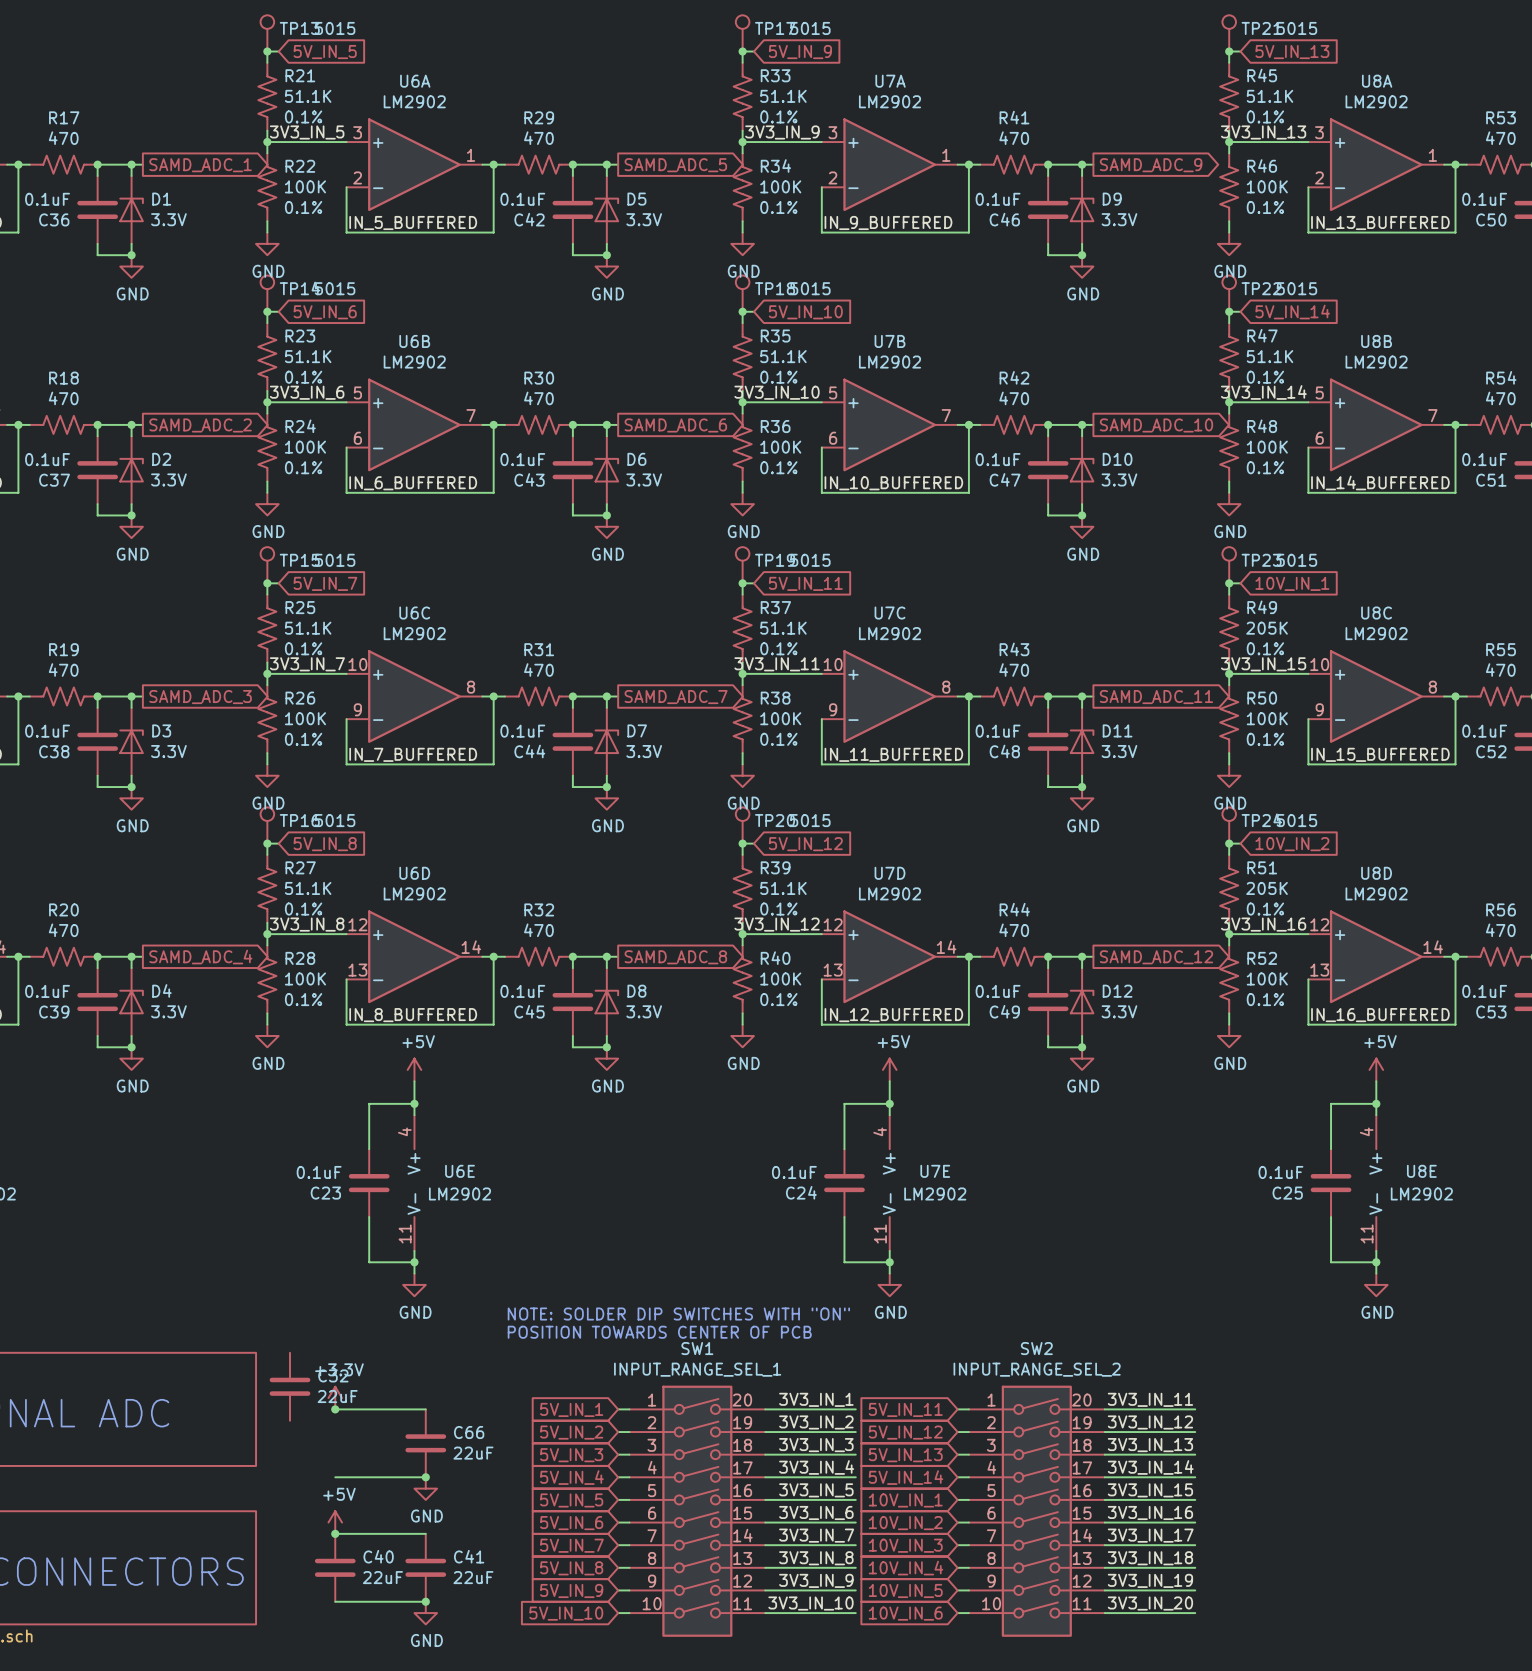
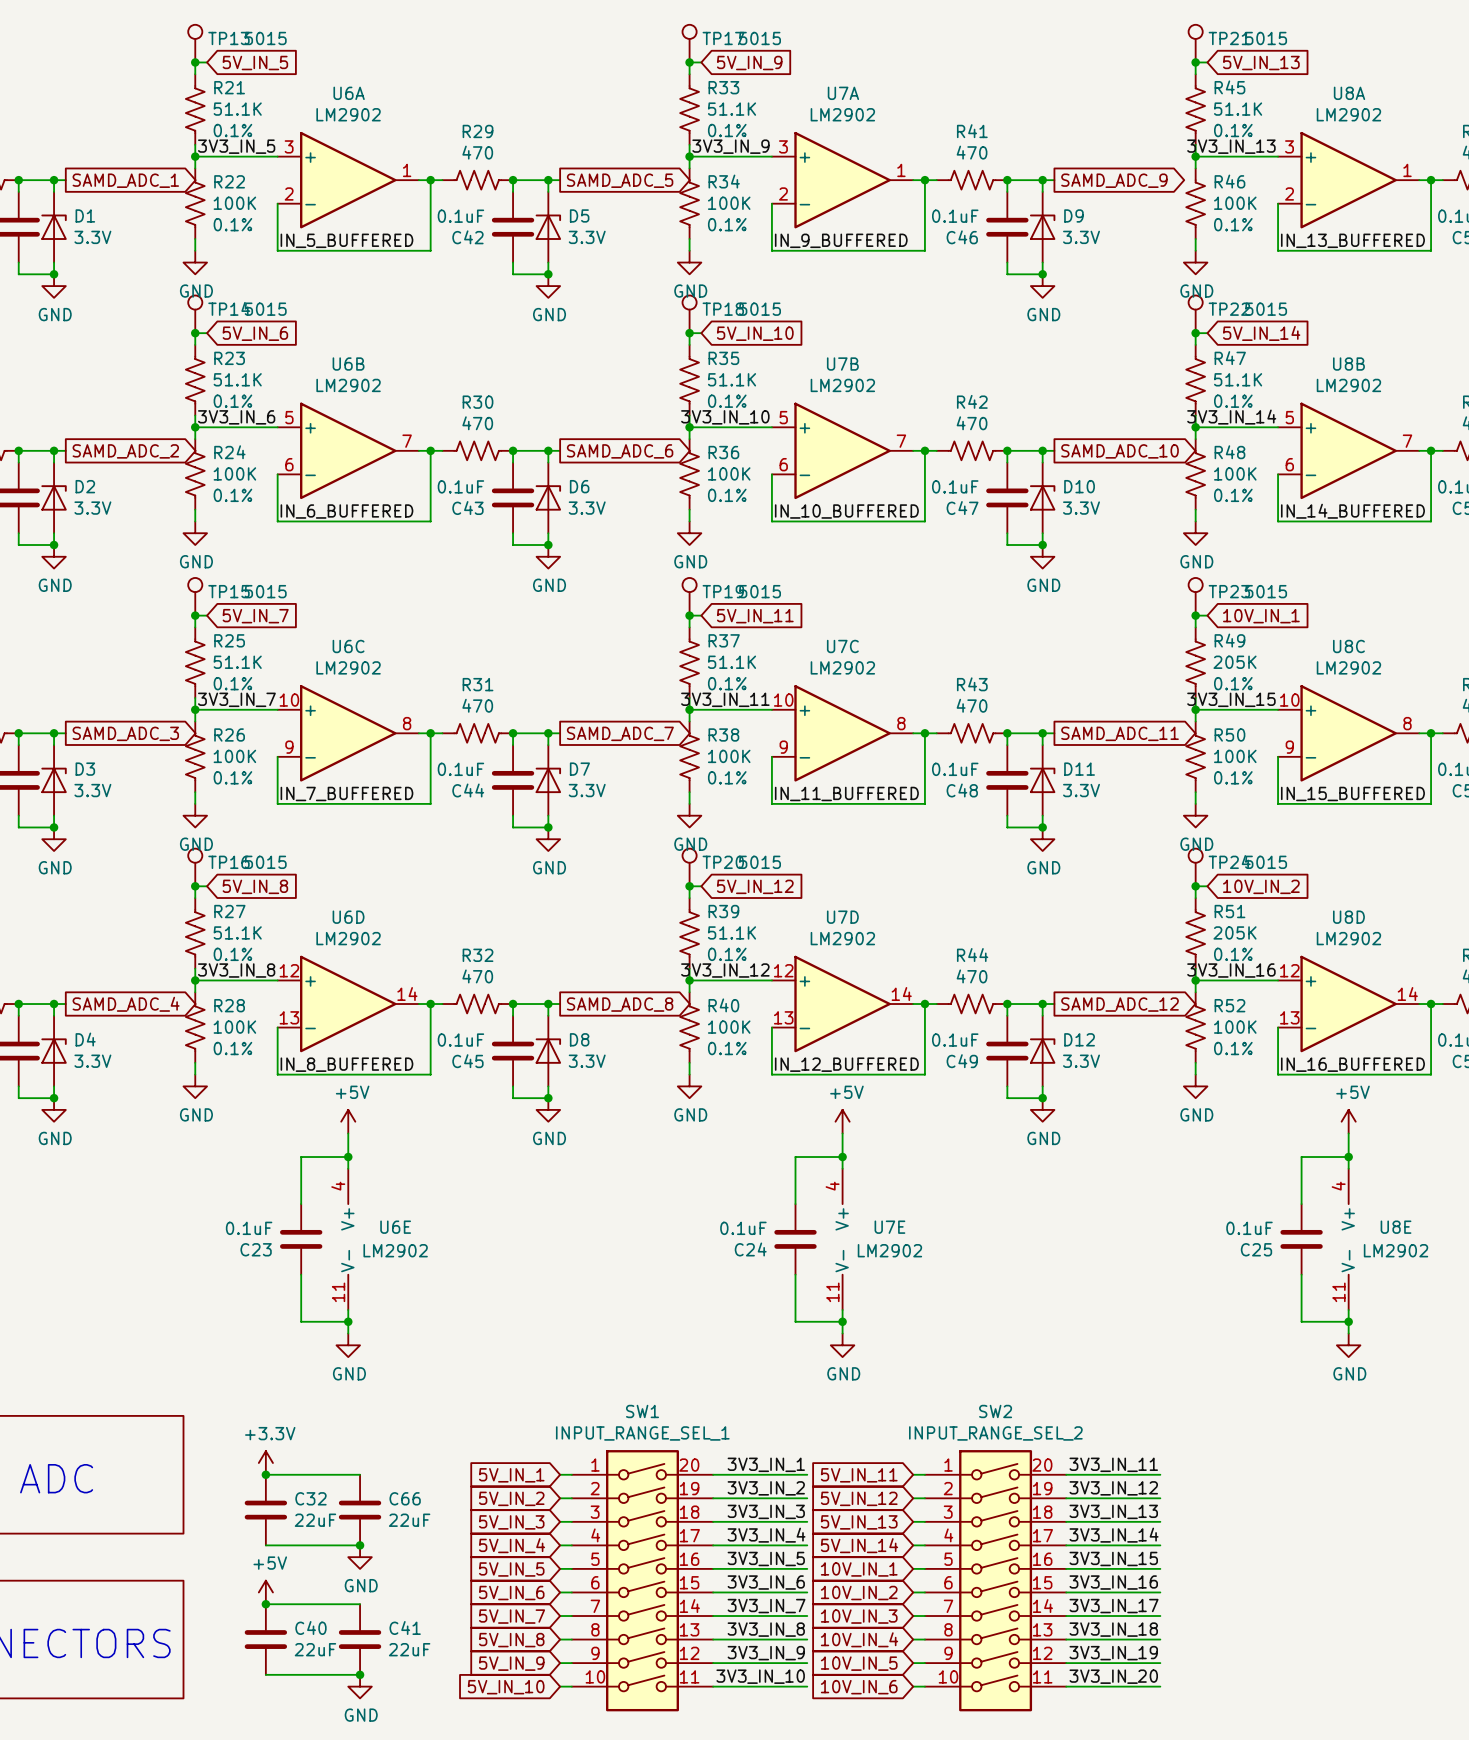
text: NOTE: SOLDER DIP SWITCHES WITH "ON" (678, 1314) -> none
text: POSITION TOWARDS CENTER OF PCB (659, 1332) -> none
C32 position: (289, 1386) -> (265, 1510)

